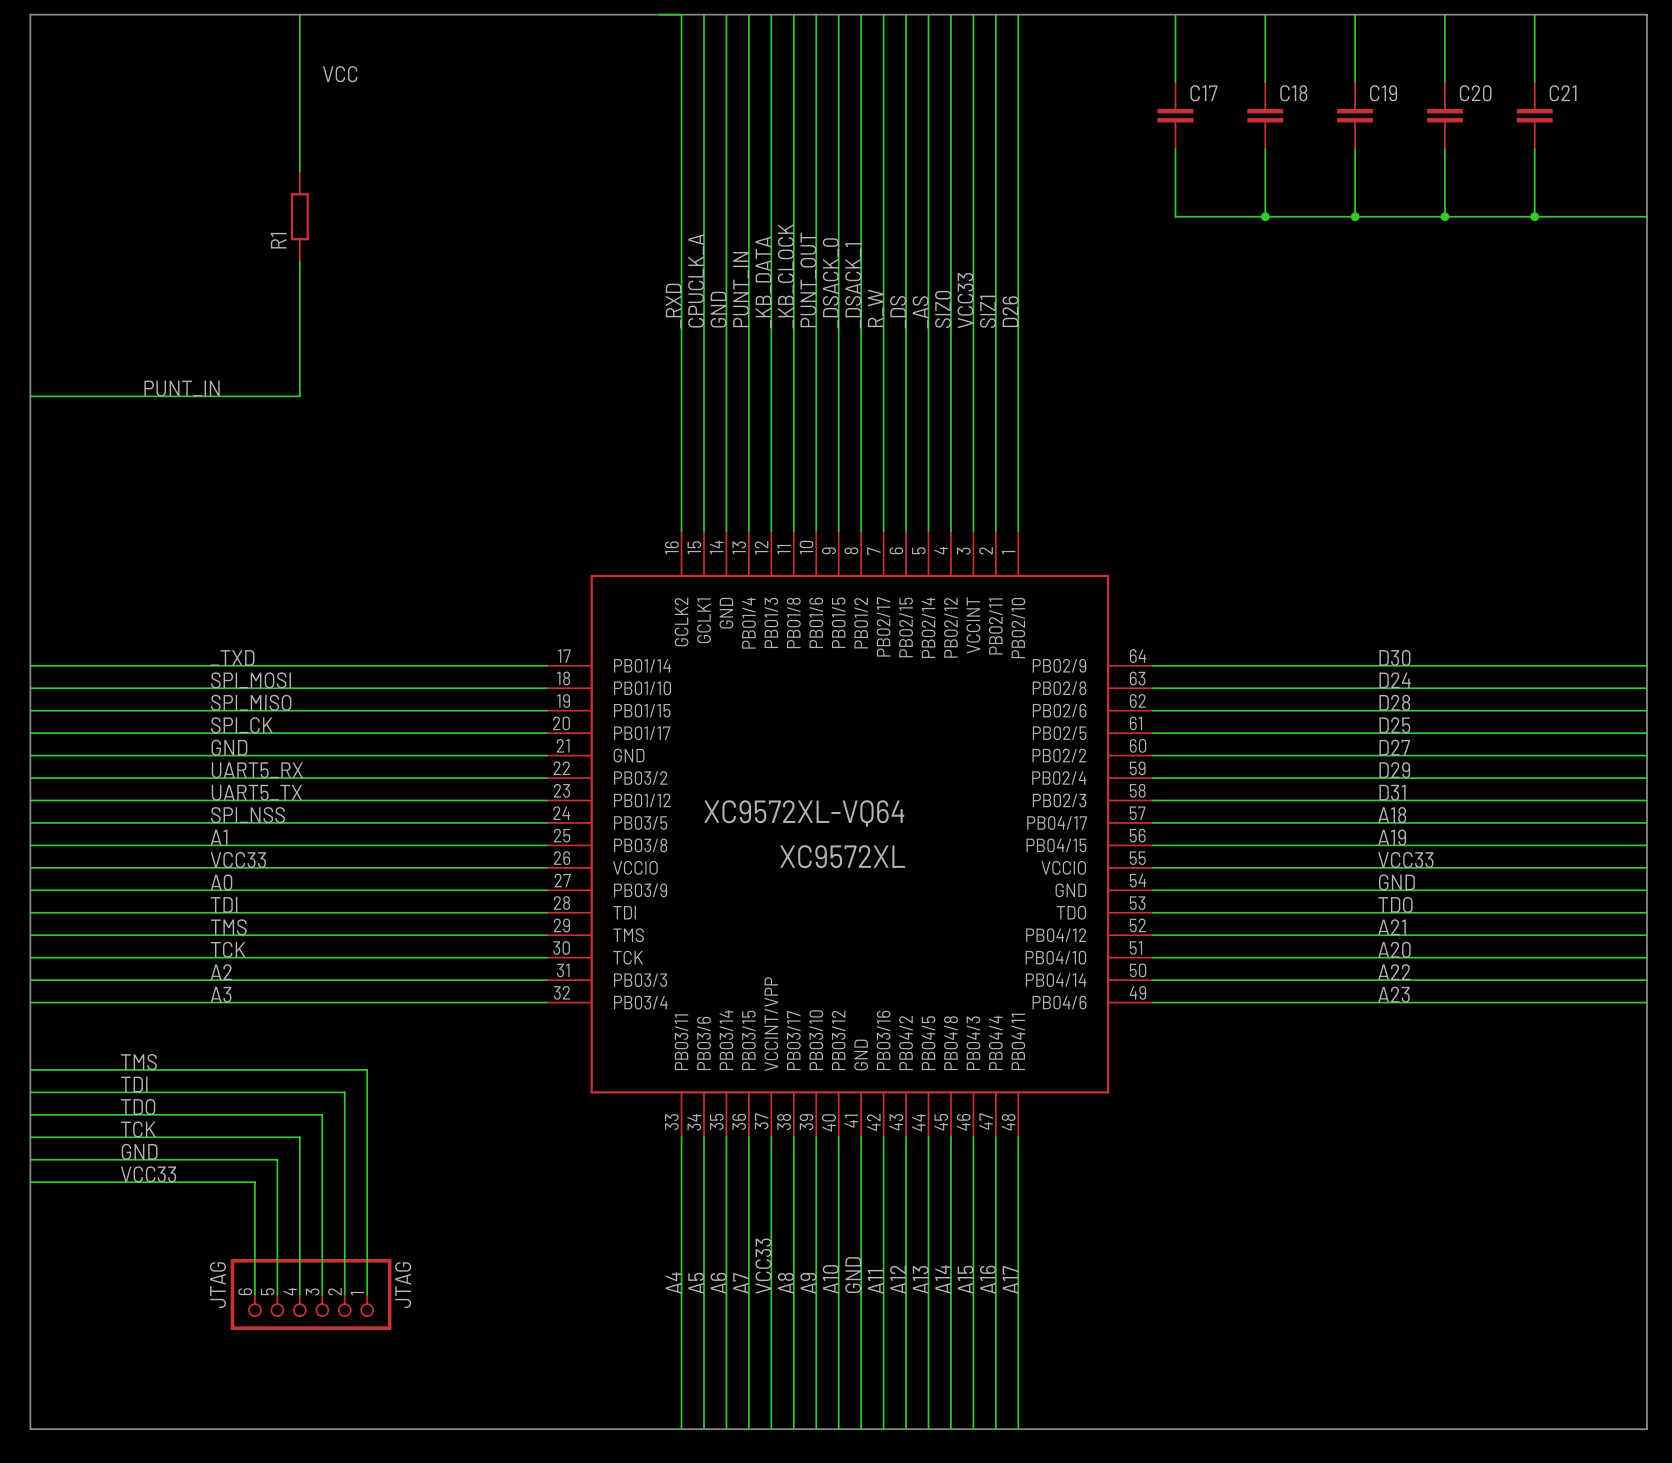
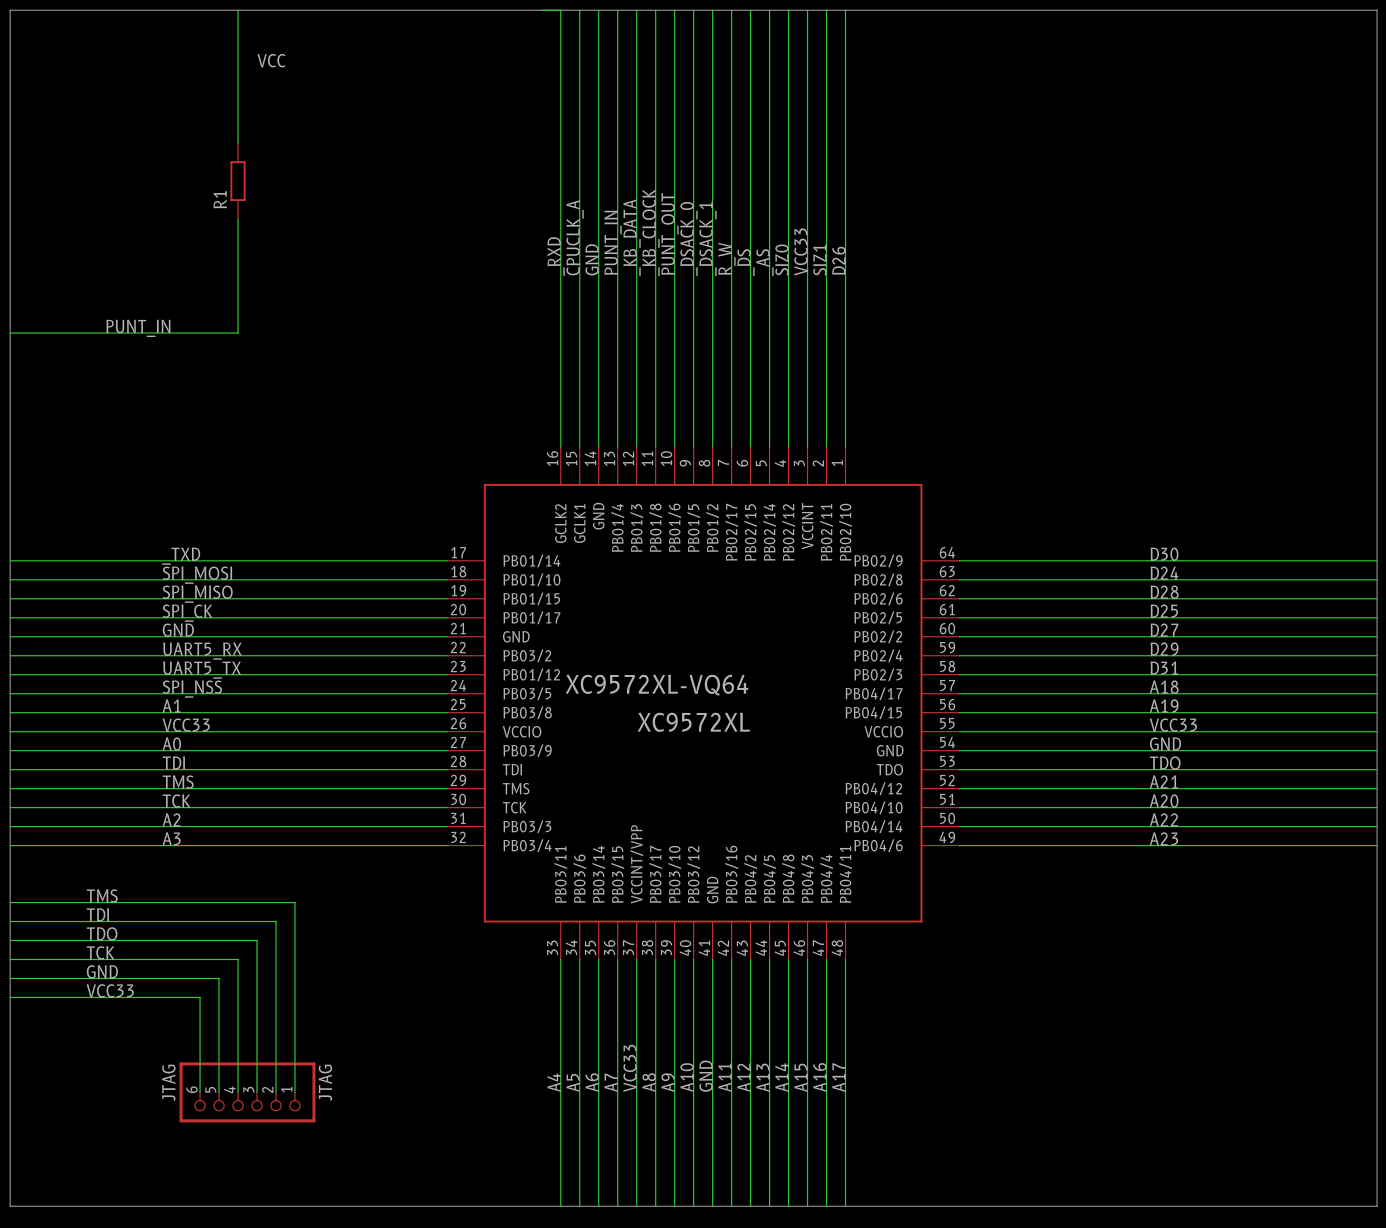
wire: (1175, 14) (1175, 82) -> none
wire: (1265, 14) (1265, 82) -> none
wire: (1355, 14) (1355, 82) -> none
wire: (1444, 14) (1444, 82) -> none
wire: (1534, 14) (1534, 82) -> none
C17: (1175, 115) -> none
C18: (1265, 115) -> none
C19: (1355, 115) -> none
C20: (1444, 115) -> none
C21: (1534, 115) -> none
wire: (1175, 149) (1175, 216) (1646, 216) -> none
wire: (1265, 149) (1265, 216) -> none
wire: (1355, 149) (1355, 216) -> none
wire: (1444, 149) (1444, 216) -> none
wire: (1534, 149) (1534, 216) -> none
junction: (1265, 216) -> none
junction: (1355, 216) -> none
junction: (1444, 216) -> none
junction: (1534, 216) -> none

